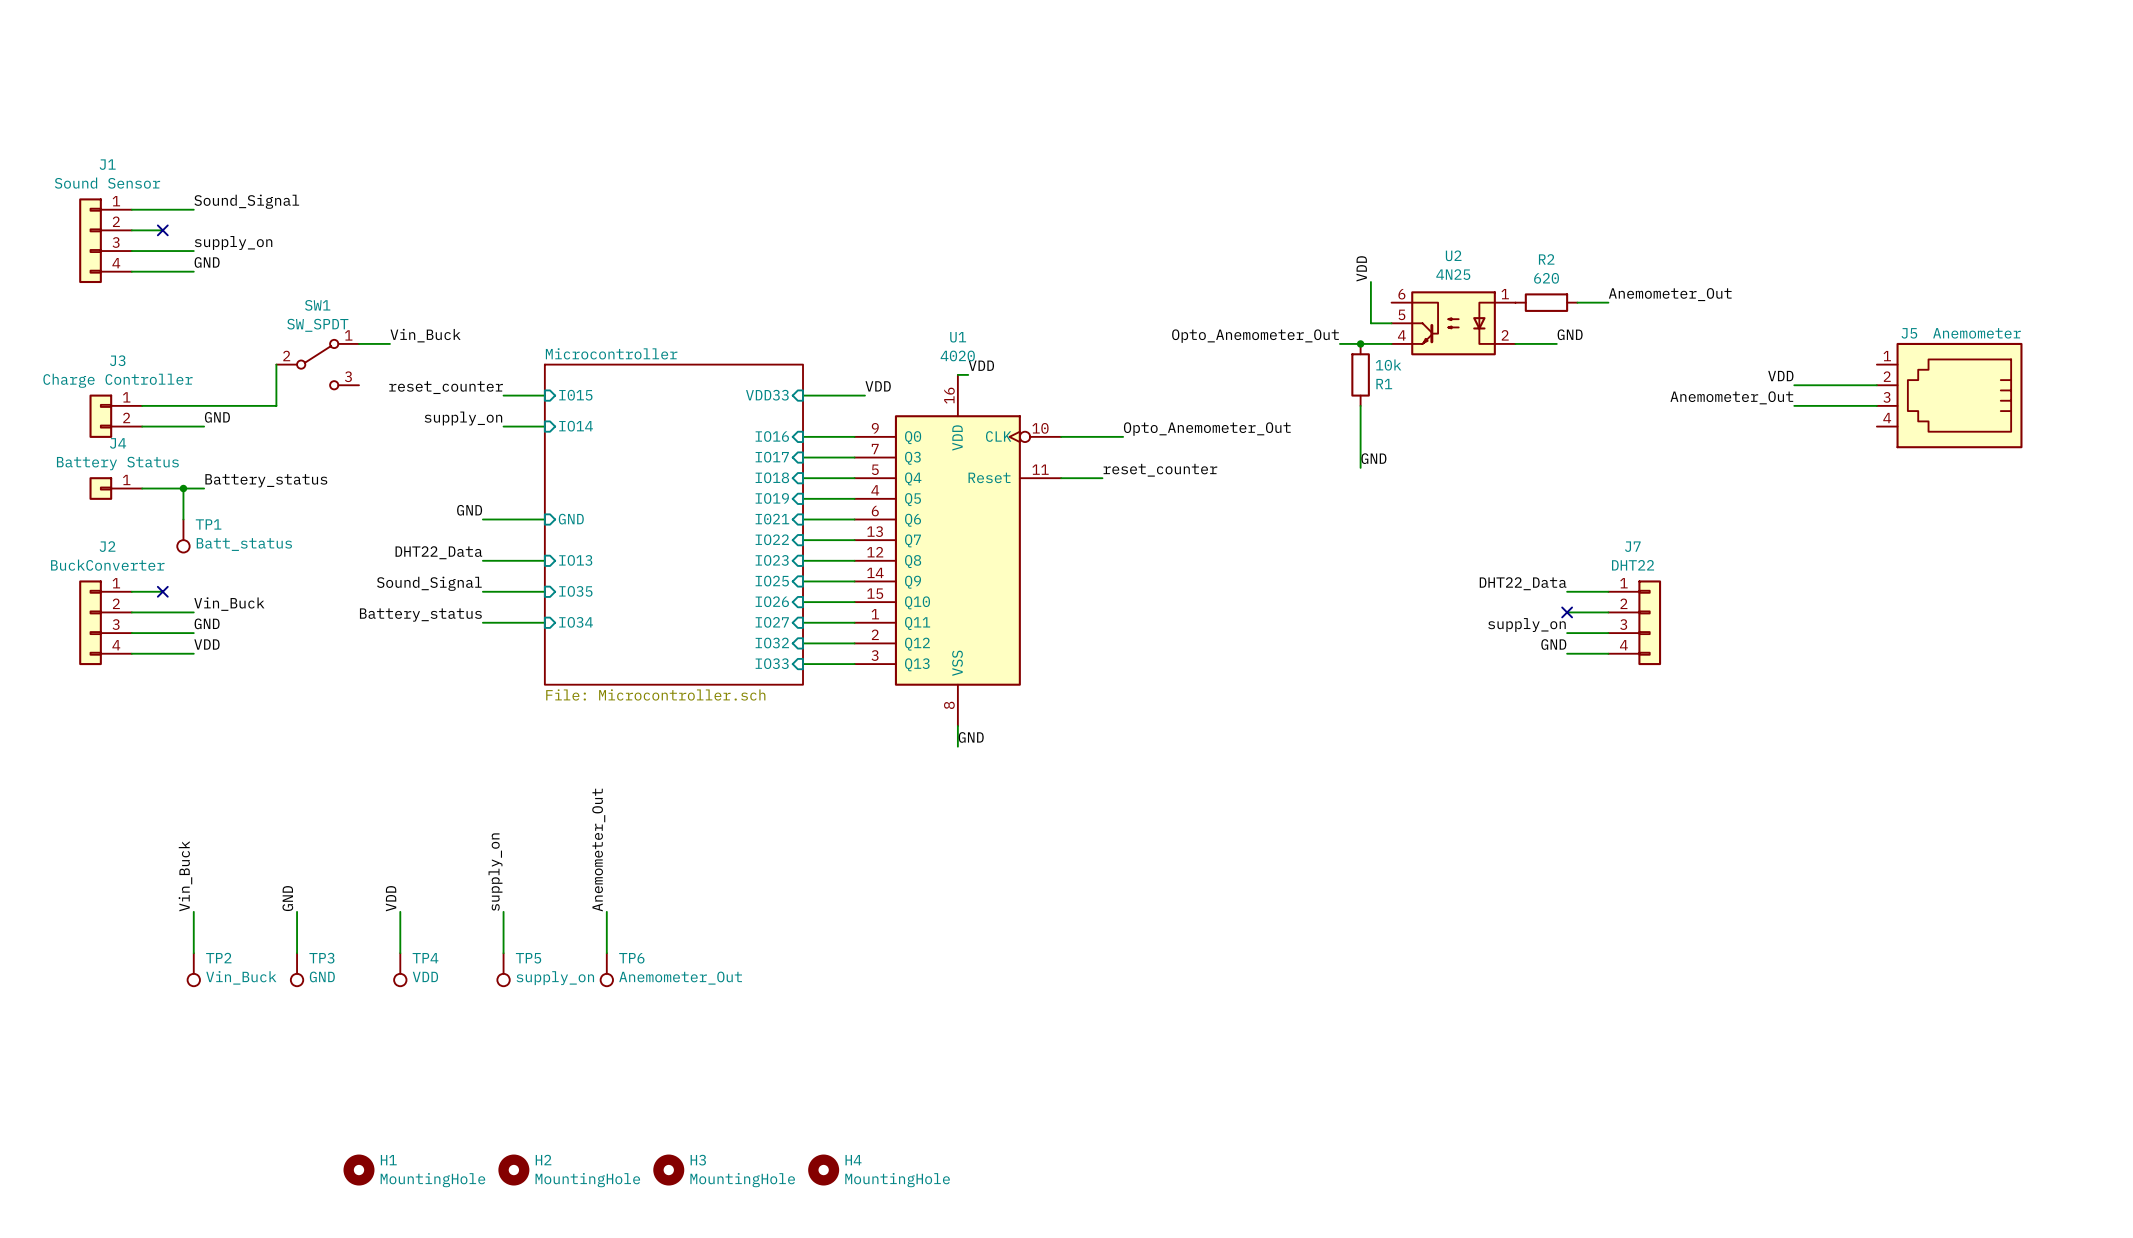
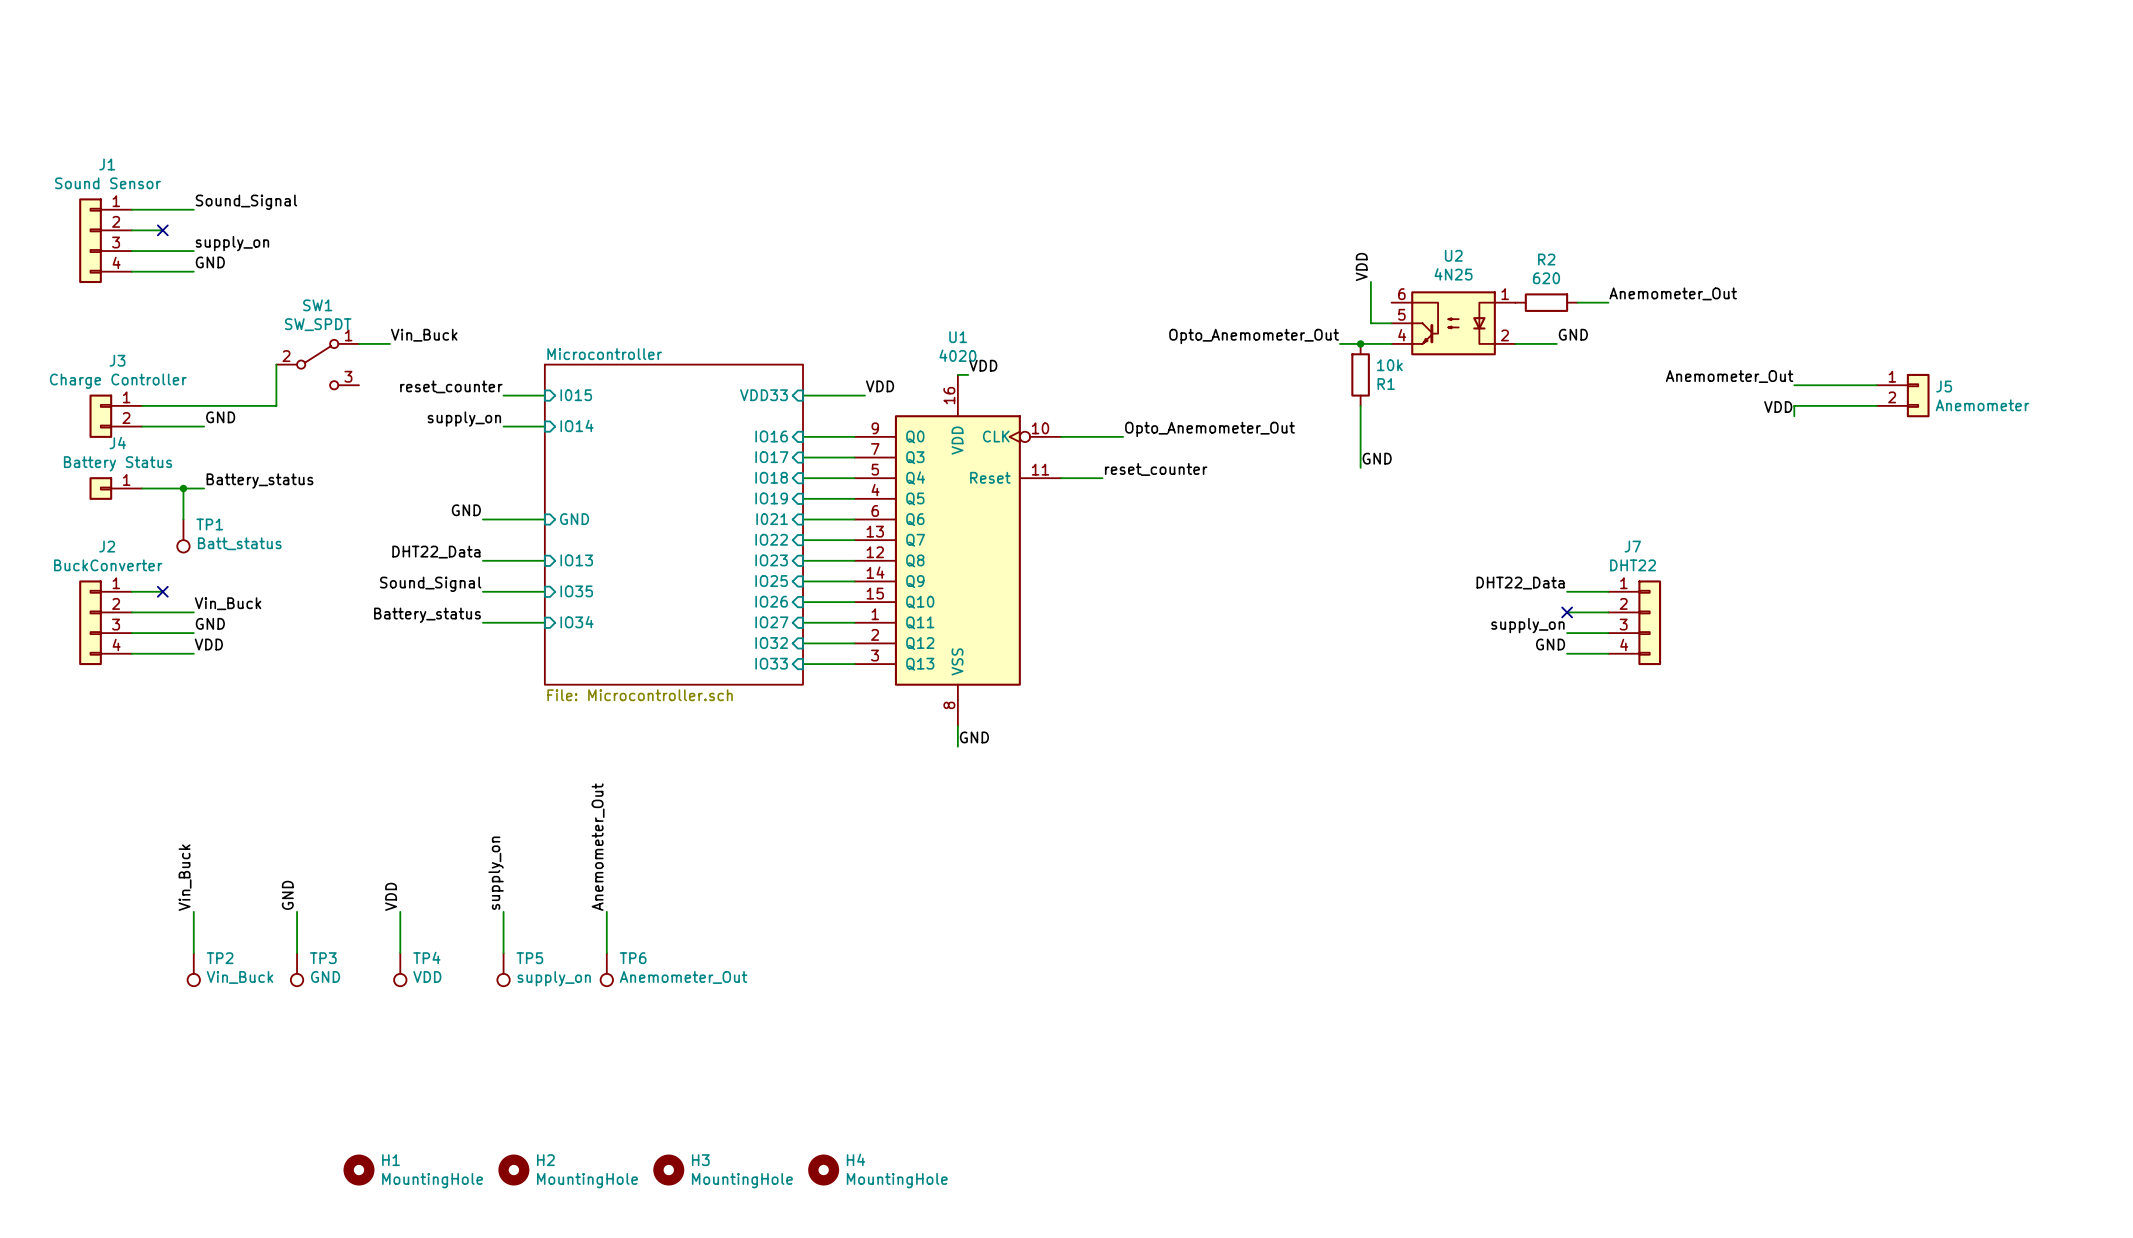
J5 name position: J5 (1909, 333) -> J5 (1944, 386)
J5 value position: Anemometer (1977, 333) -> Anemometer (1982, 405)
J5 symbol: [1876, 342, 2023, 449] -> [1876, 373, 1930, 418]
label: VDD (1780, 376) -> Anemometer_Out (1729, 376)
label: Anemometer_Out (1731, 397) -> none
wire: none -> (1794, 405) (1794, 416)
label: none -> VDD (1778, 407)

